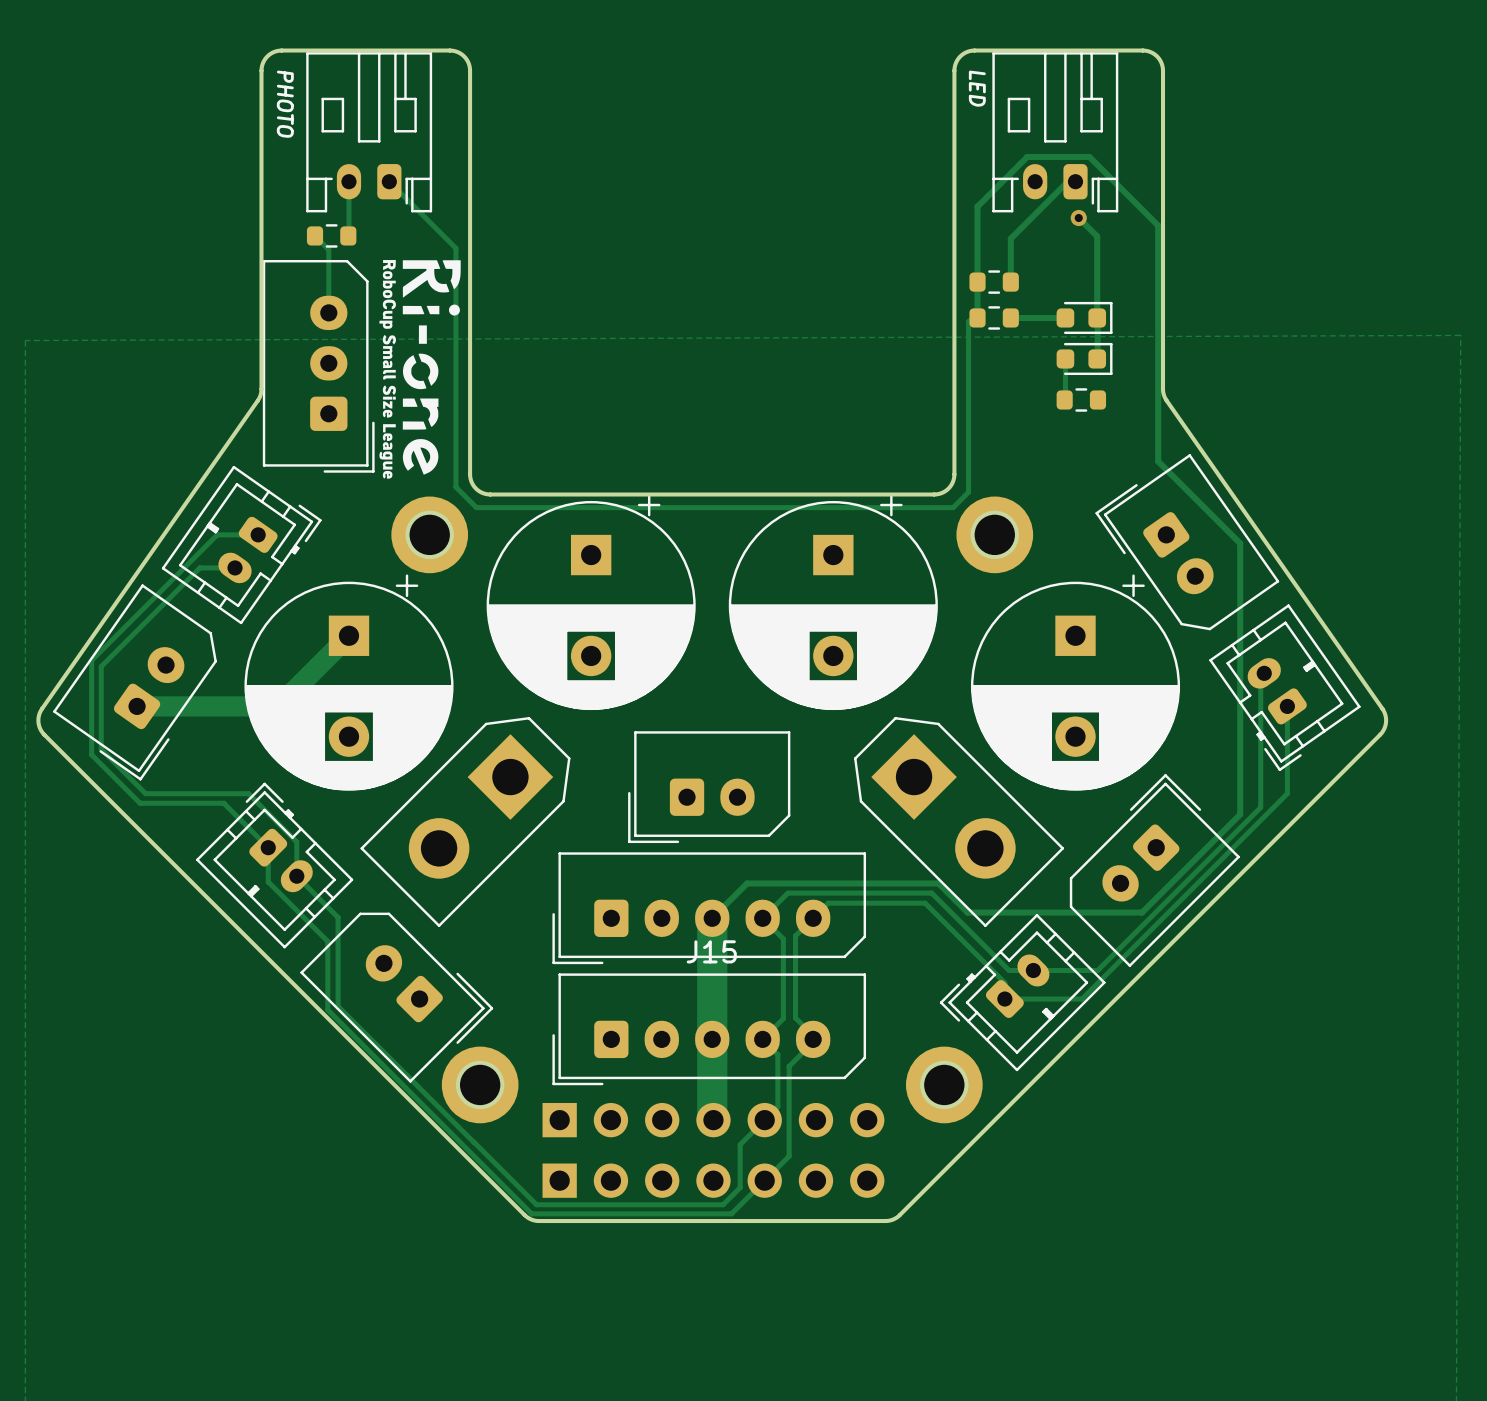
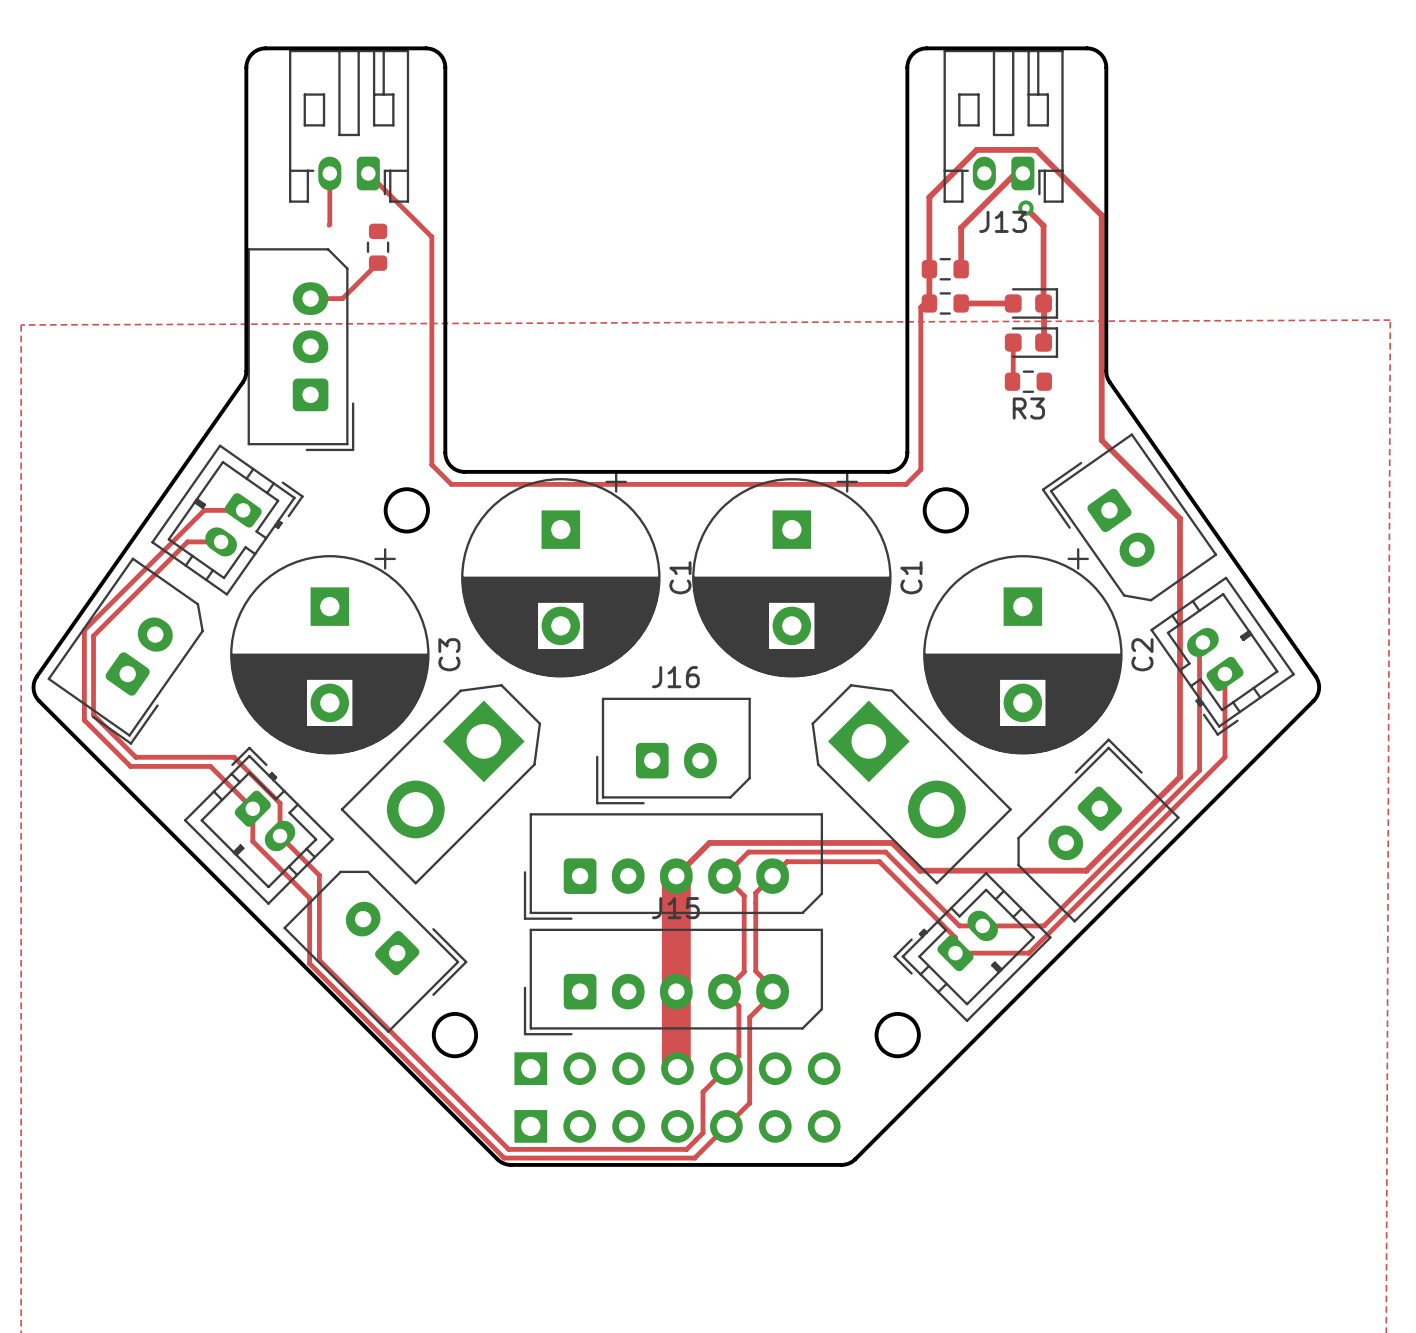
text: LED (977, 88) -> none
text: PHOTO (285, 104) -> none
J13 name: none -> J13 (1003, 221)
track: (315, 235) (328, 249) (328, 312) -> (378, 263) (342, 298) (310, 298)
part rotation: 0° (331, 235) -> 90° clockwise (378, 247)
part position: (331, 235) -> (378, 247)
drawing: [379, 260, 461, 479] -> none
R3 name: none -> R3 (1028, 408)
part: (429, 534) -> none
part: (994, 534) -> none
C1 name: none -> C1 (680, 577)
C1 name: none -> C1 (911, 577)
track: (348, 635) (278, 706) (137, 706) -> none
C3 name: none -> C3 (449, 654)
C2 name: none -> C2 (1142, 654)
J16 name: none -> J16 (675, 677)
part: (480, 1084) -> none
part: (944, 1084) -> none

